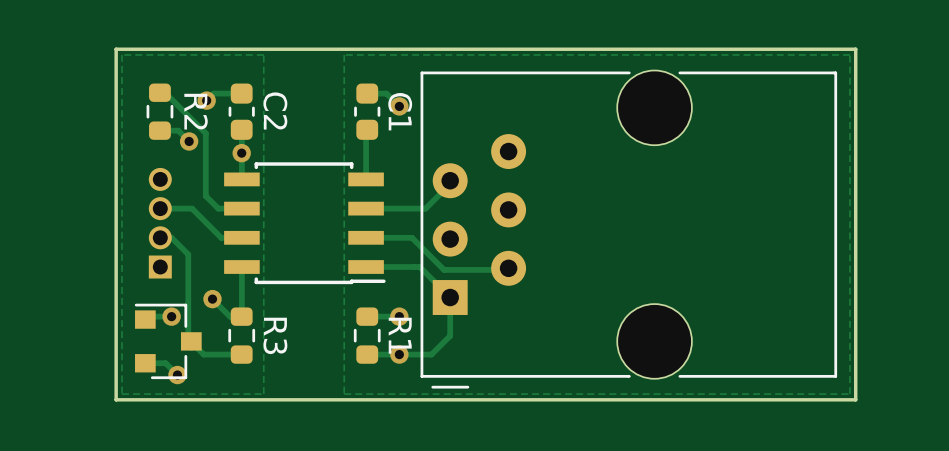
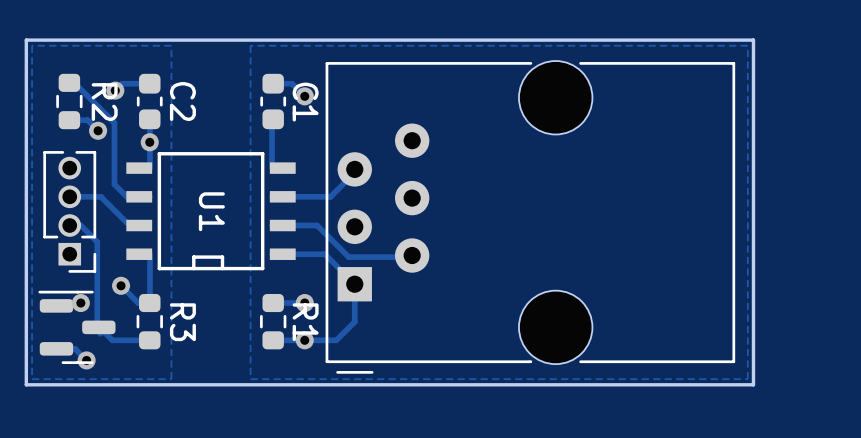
part side: top (160, 223) -> bottom (69, 211)
part: (304, 223) -> none
U1: none -> (211, 211)
part footprint: [134, 303, 202, 380] -> [38, 290, 116, 364]

